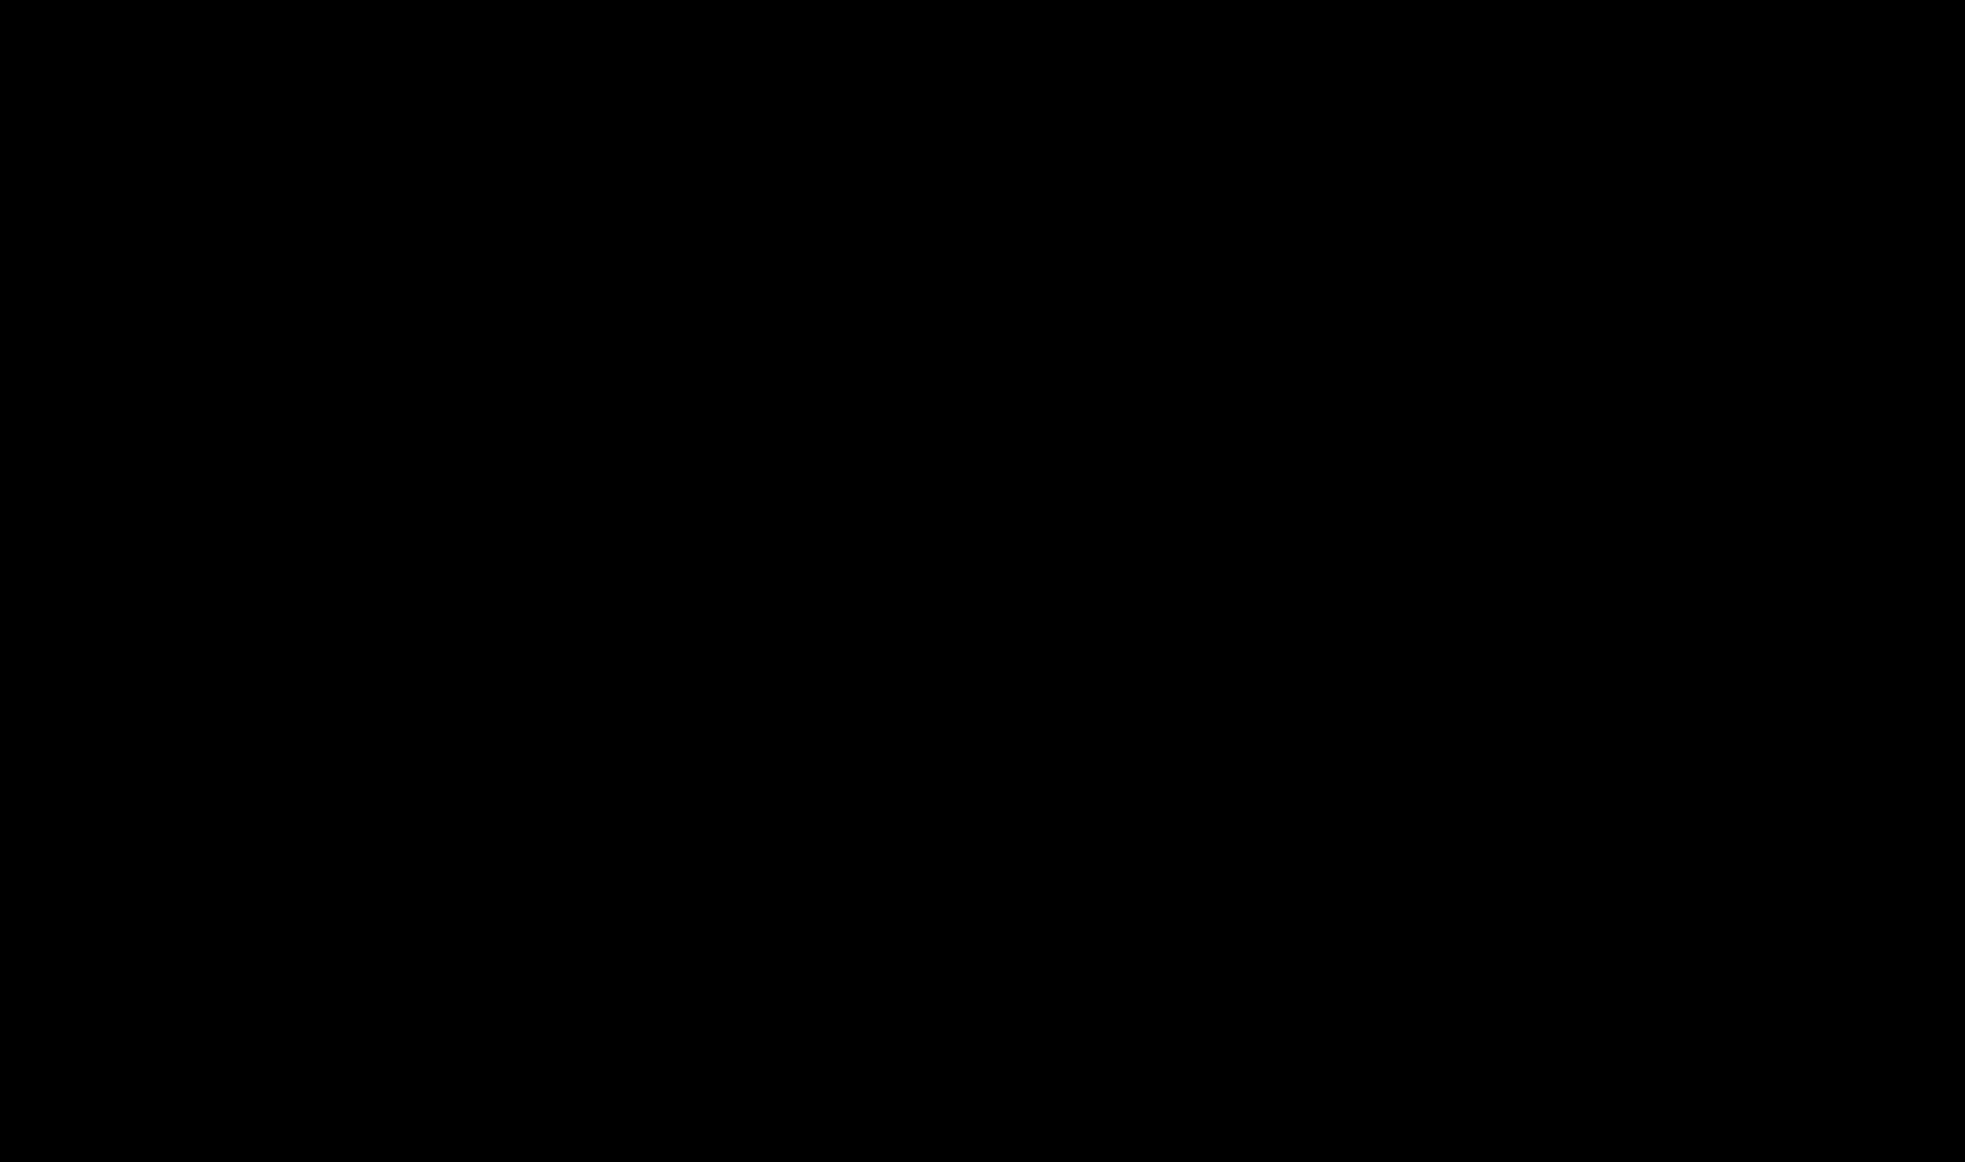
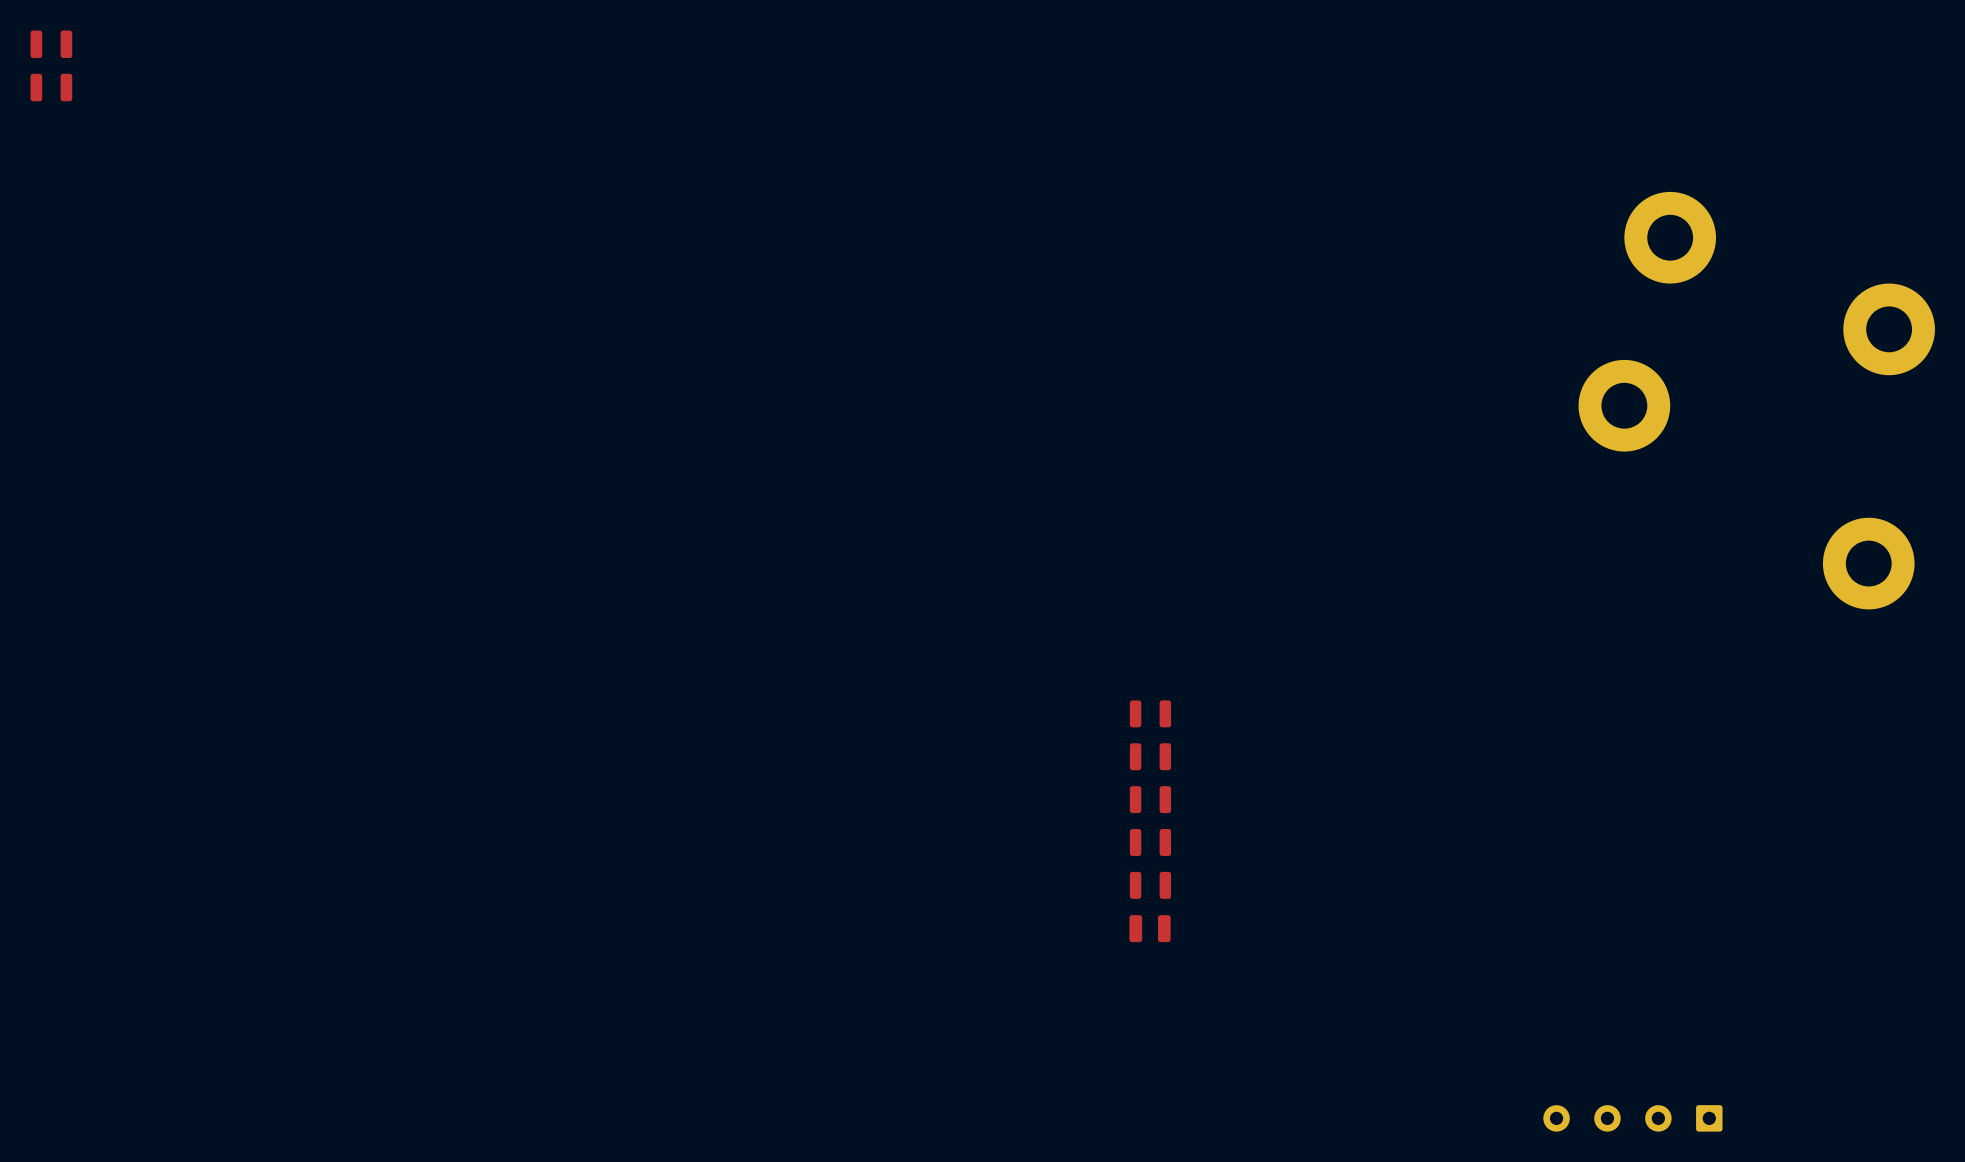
part: none -> (51, 44)
part: none -> (51, 87)
part: none -> (1670, 237)
part: none -> (1889, 329)
part: none -> (1624, 405)
part: none -> (1868, 563)
part: none -> (1150, 713)
part: none -> (1150, 756)
part: none -> (1150, 799)
part: none -> (1150, 842)
part: none -> (1150, 885)
part: none -> (1150, 928)
part: none -> (1632, 1118)

